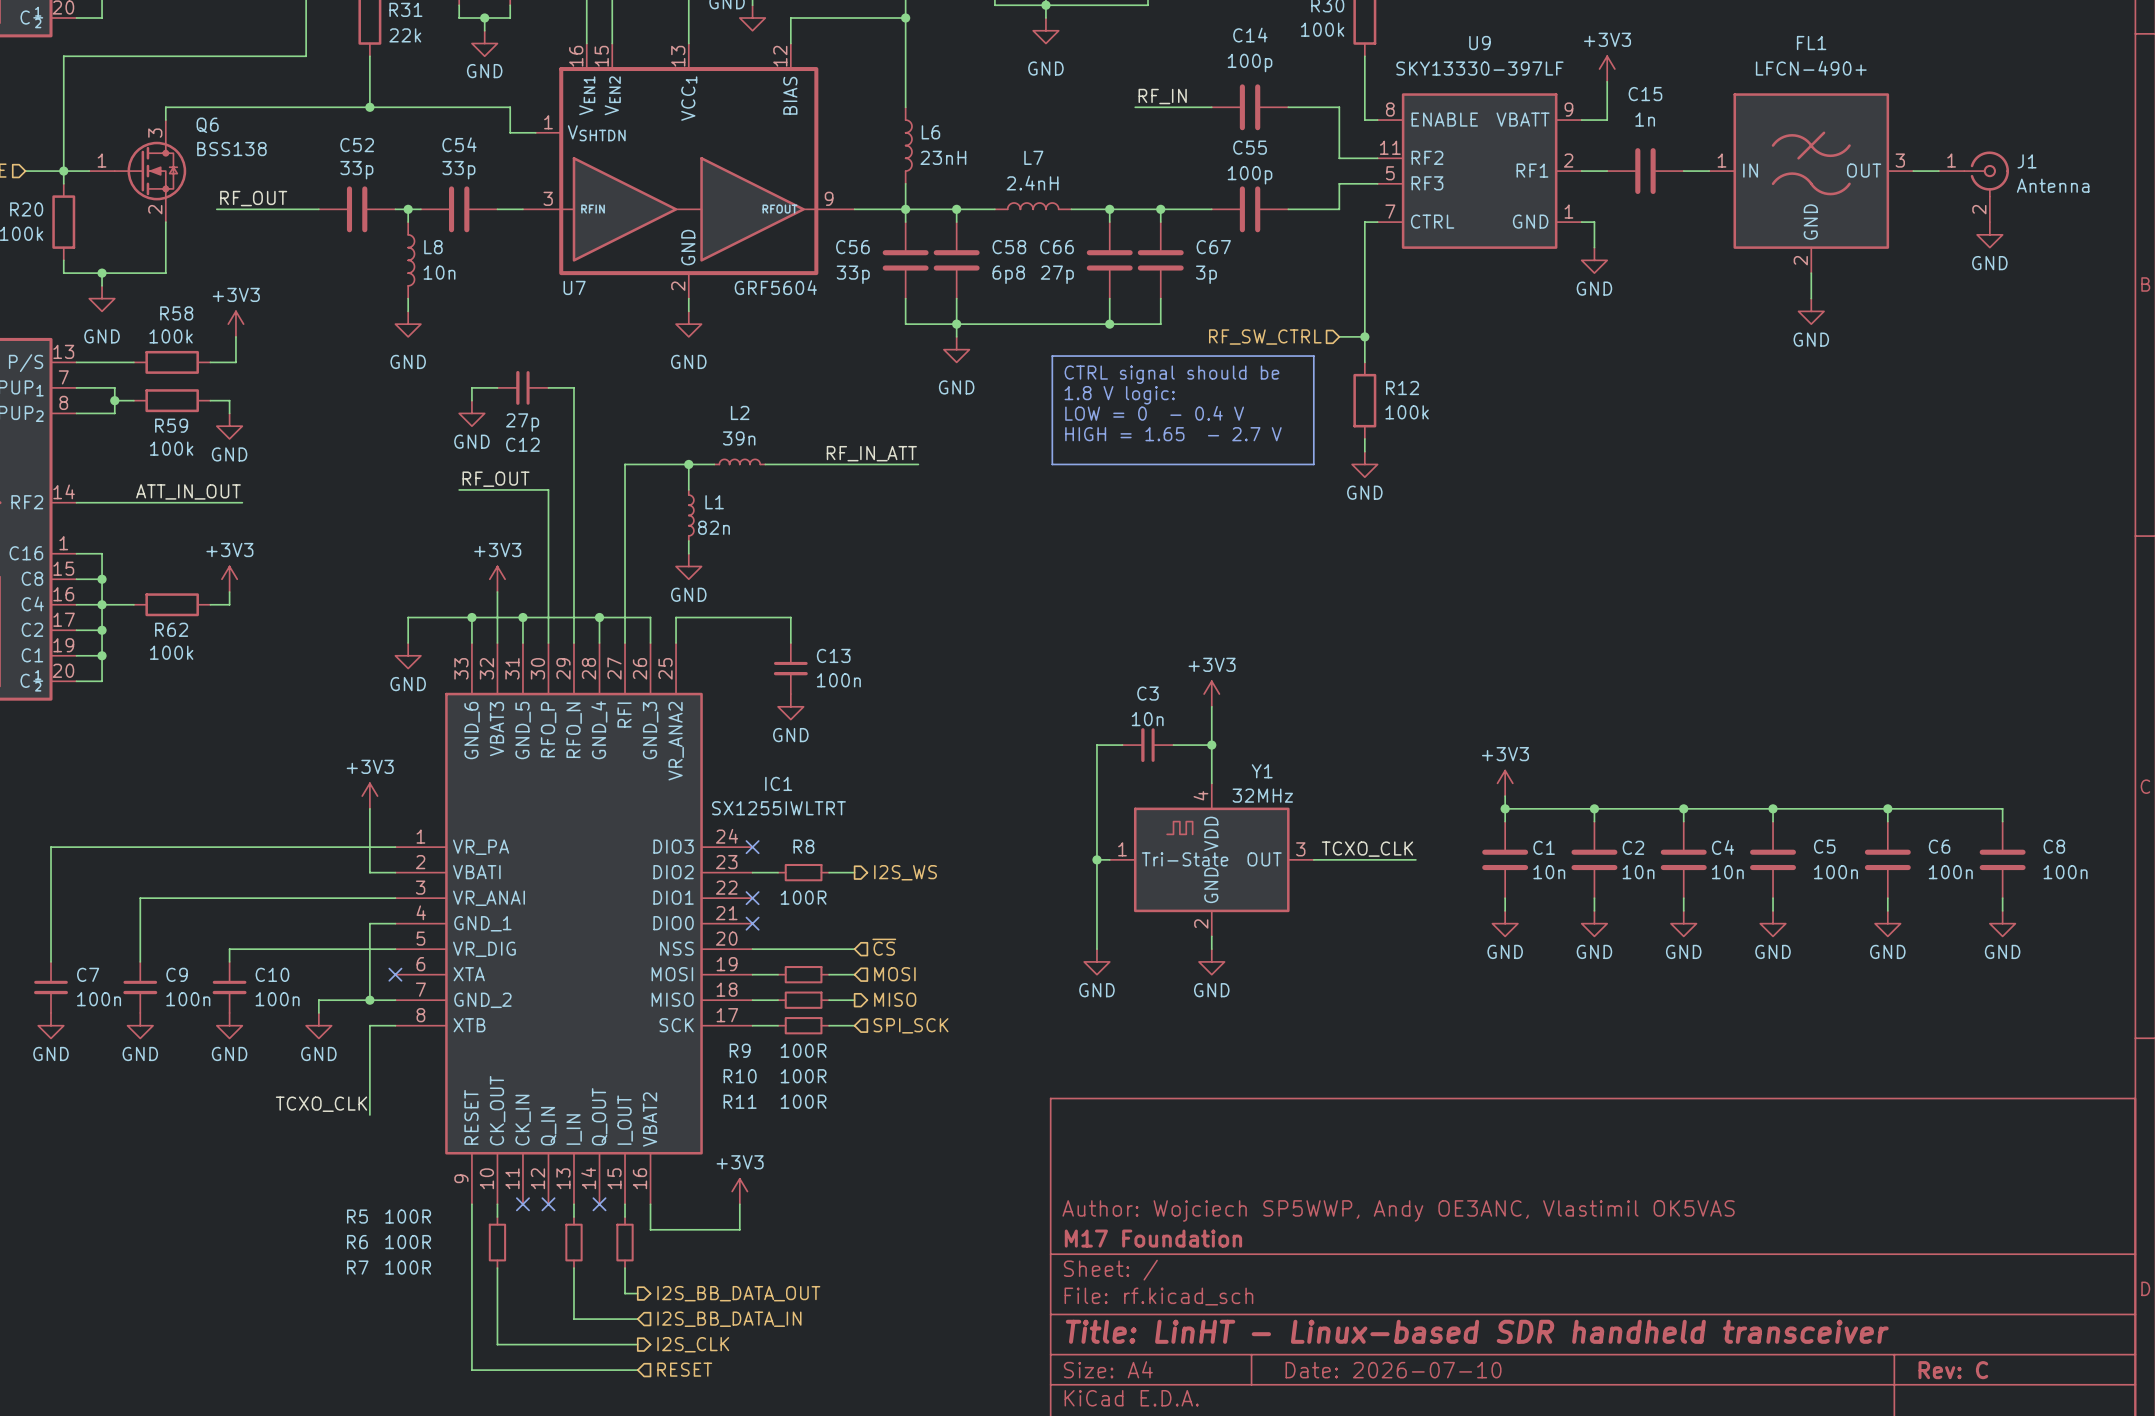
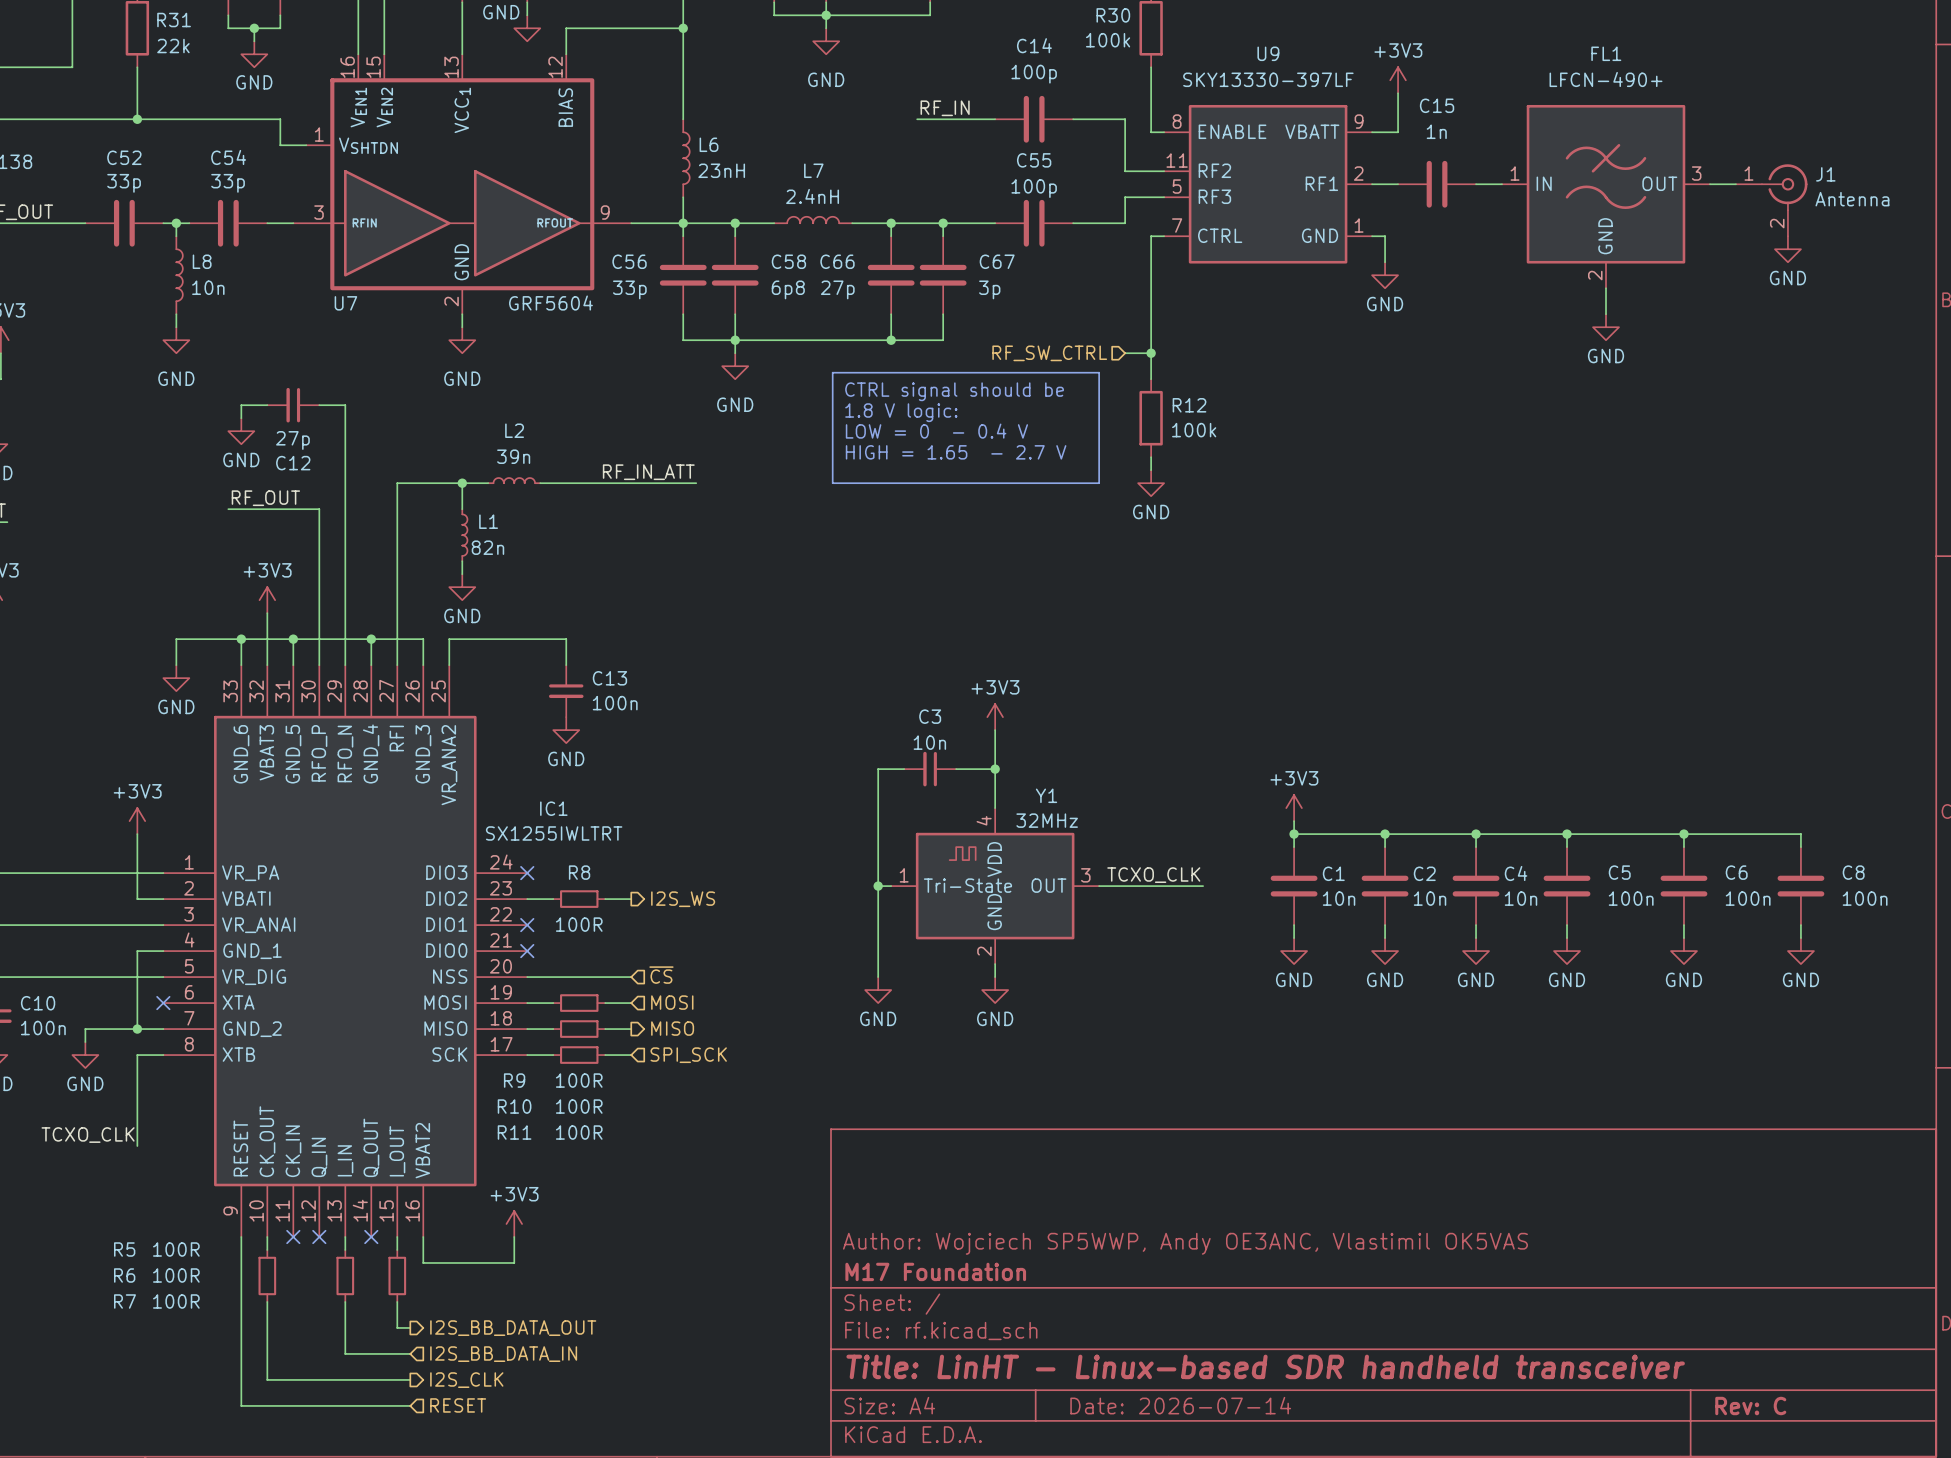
title block: Date: 2026-07-10 (1393, 1370) -> Date: 2026-07-14 (1180, 1405)

